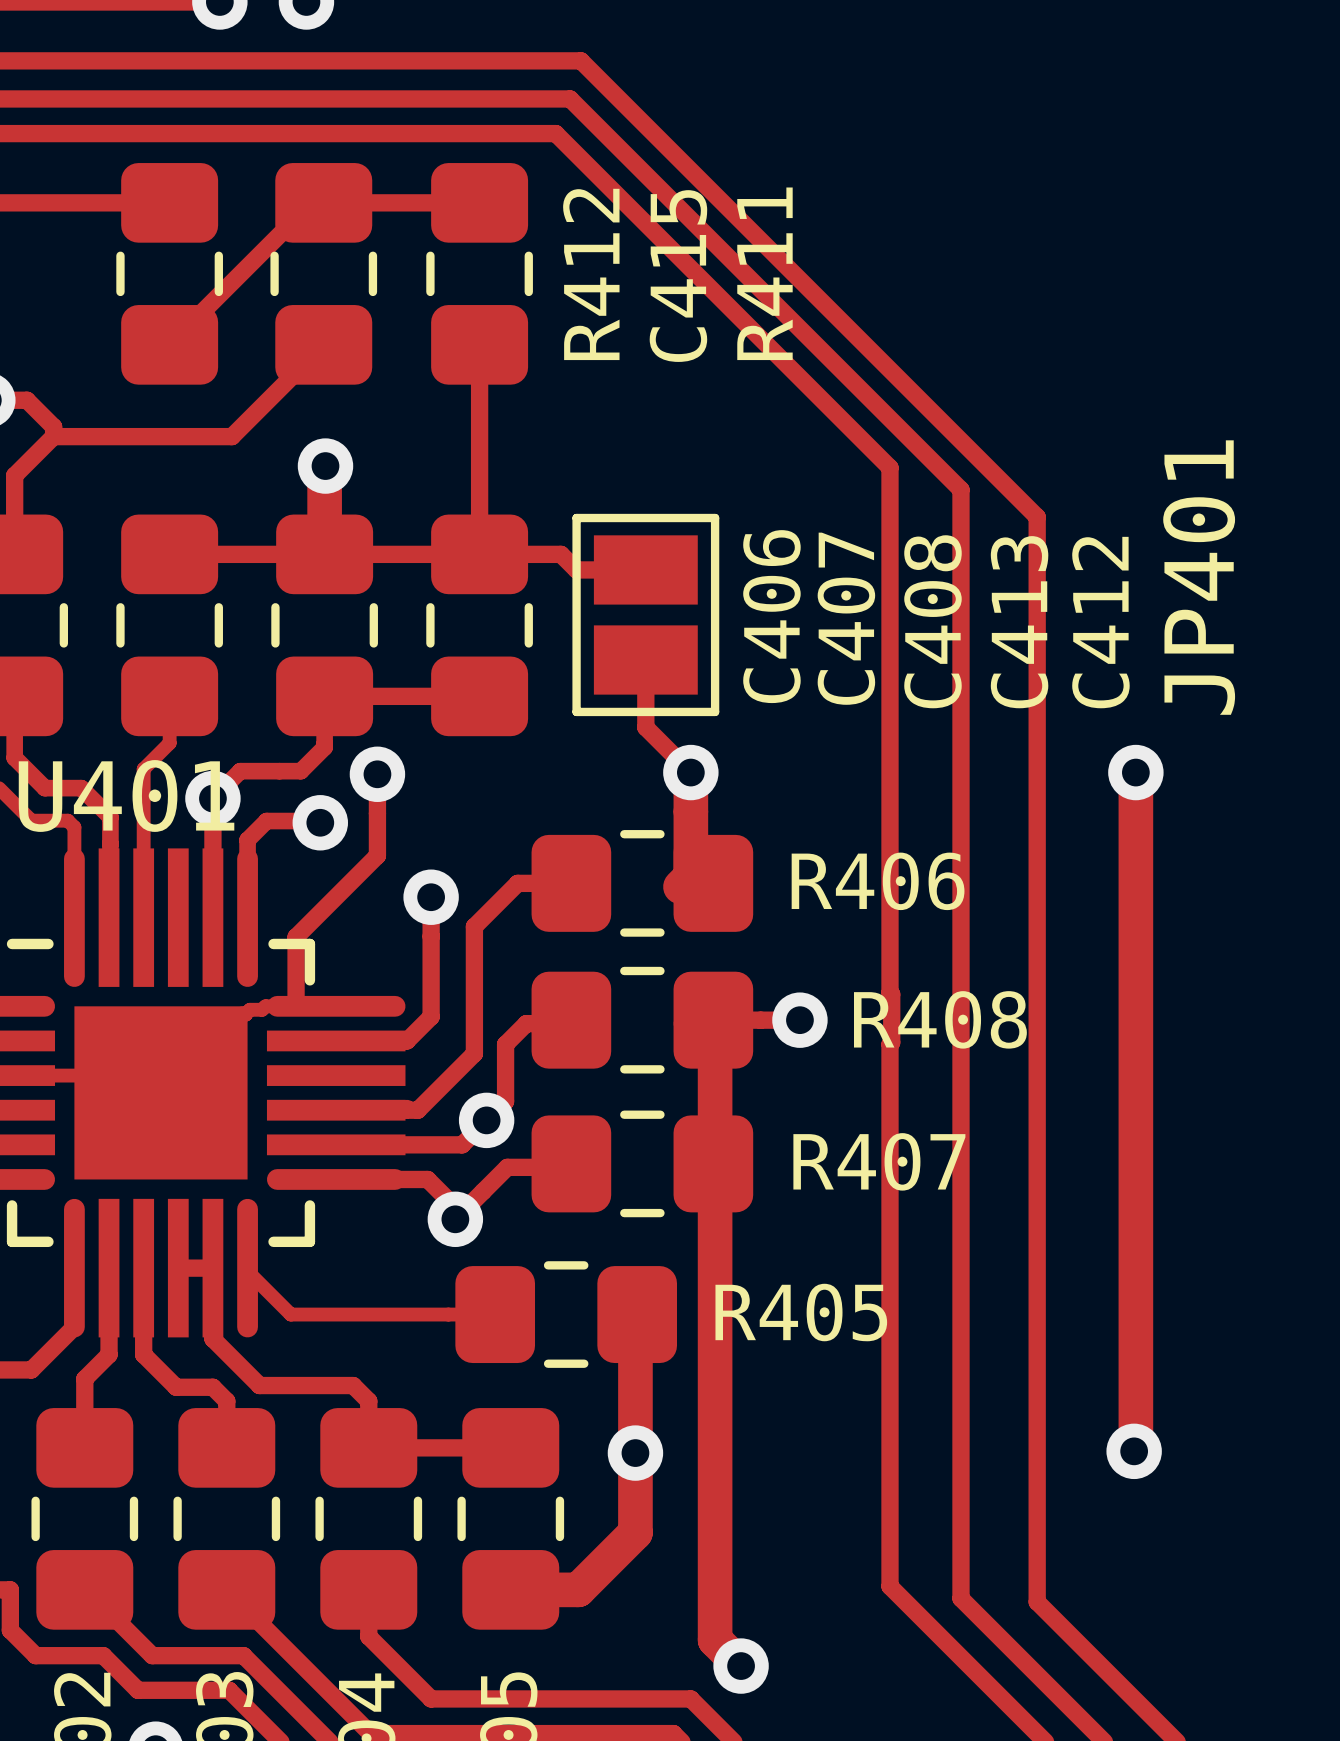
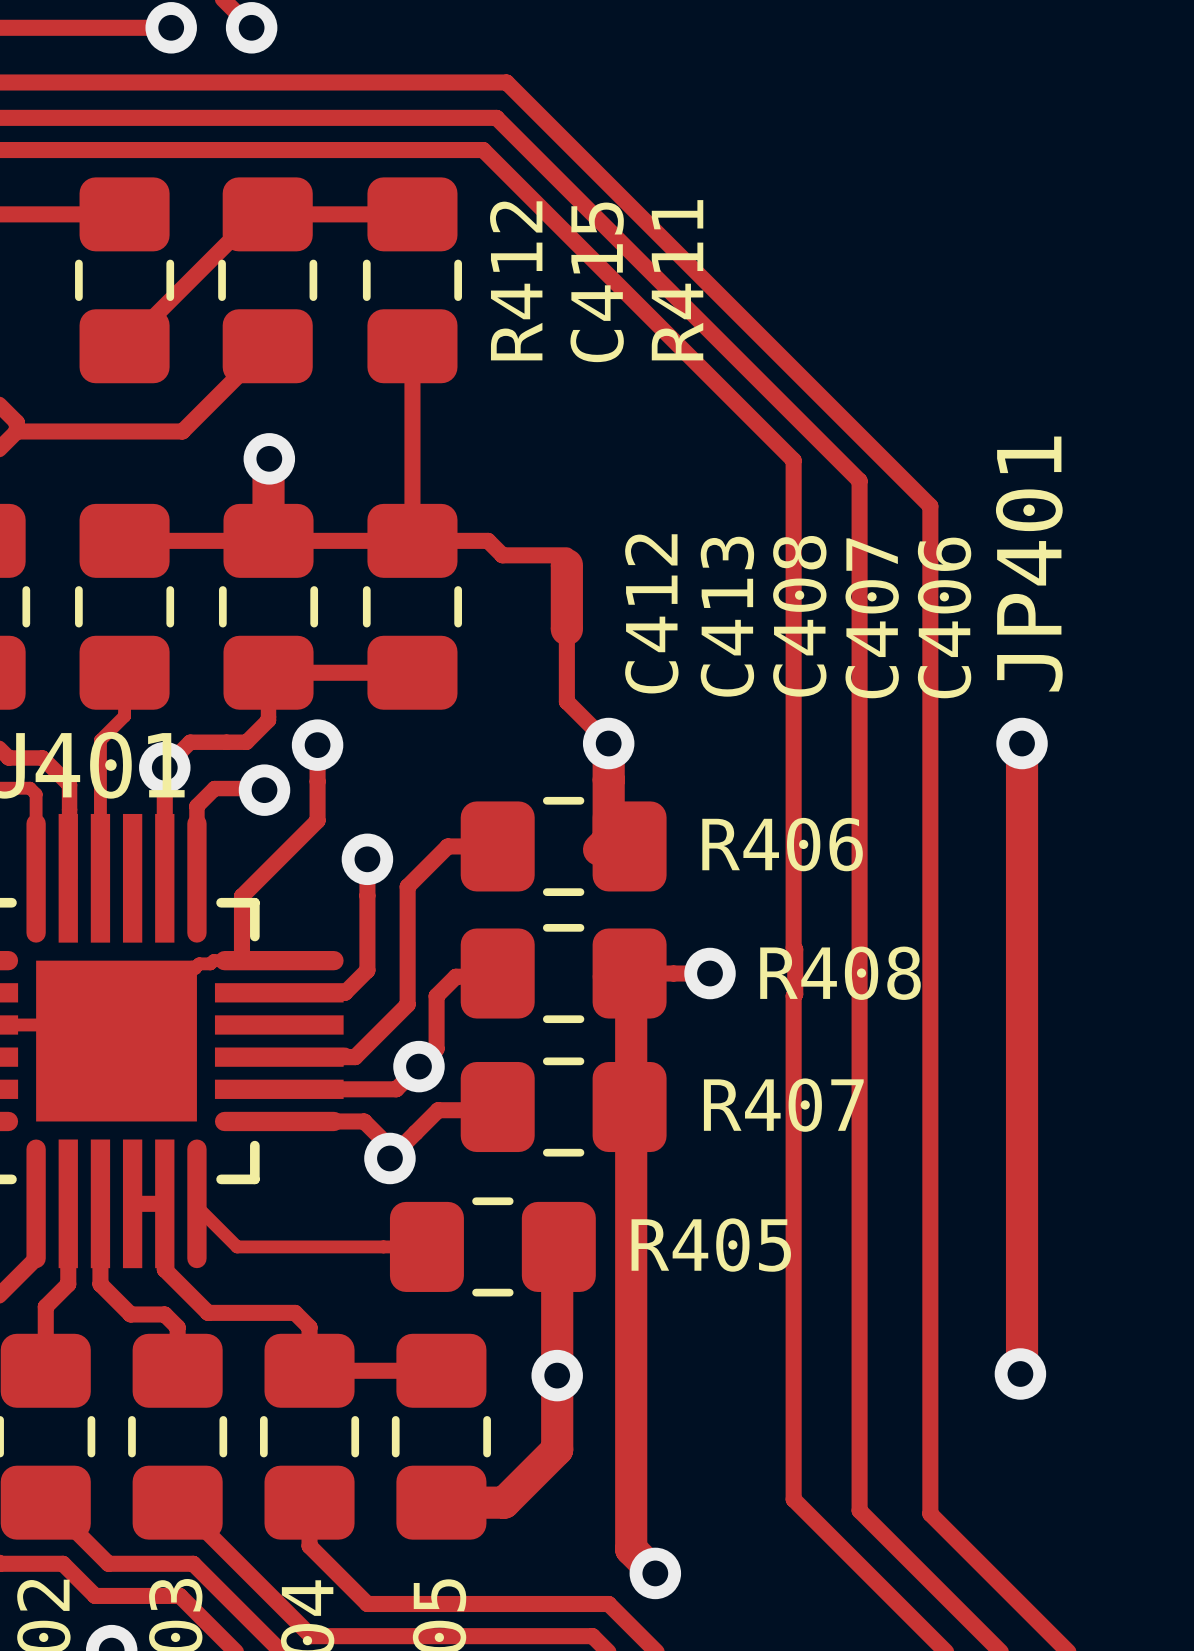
JP401 footprint: [572, 513, 720, 717] -> [550, 548, 583, 646]
C406 name position: C406 (771, 616) -> C406 (944, 617)
C407 name position: C407 (846, 618) -> C407 (872, 618)
C408 name position: C408 (932, 621) -> C408 (799, 616)
C413 name position: C413 (1019, 622) -> C413 (727, 616)
C412 name position: C412 (1100, 622) -> C412 (651, 613)

